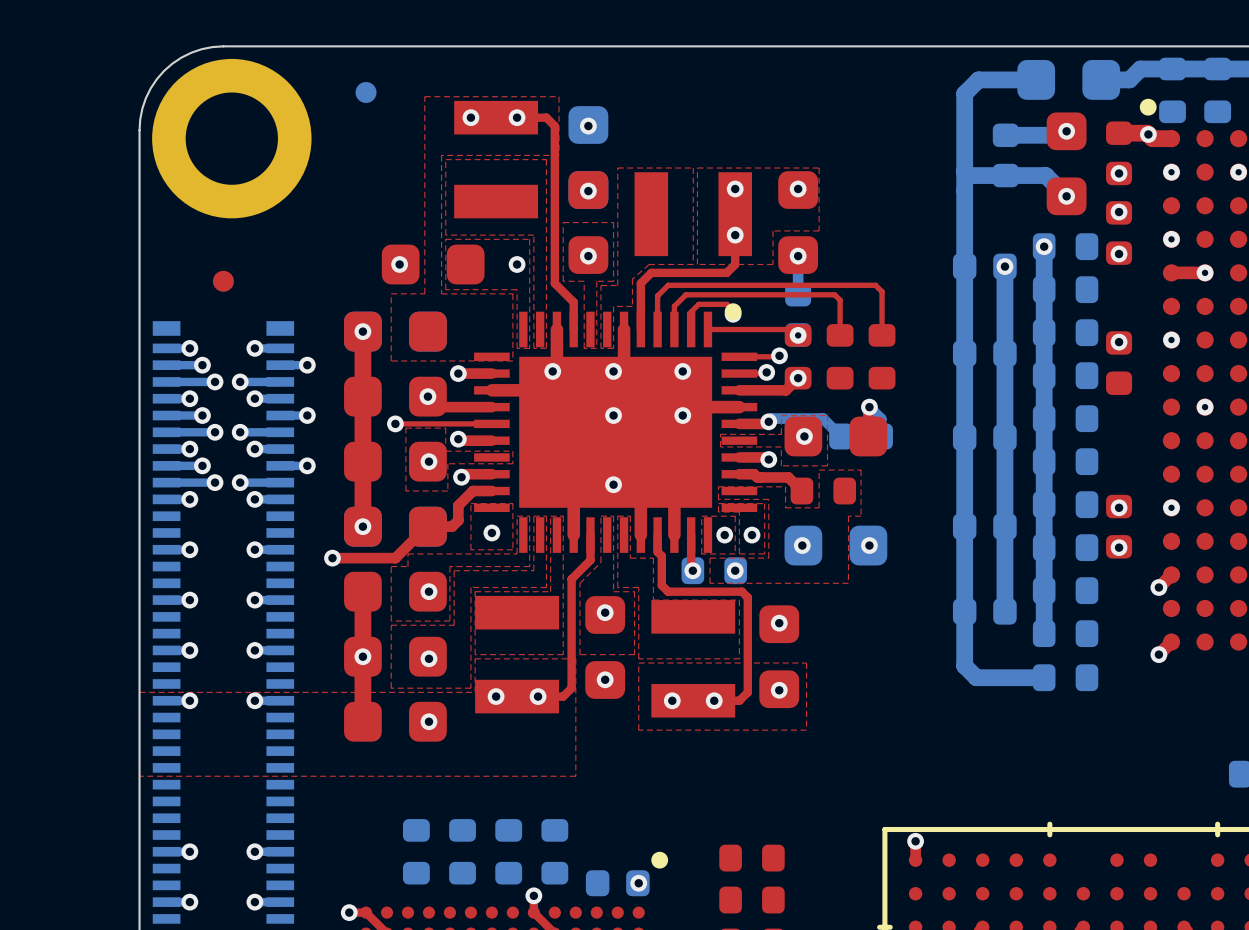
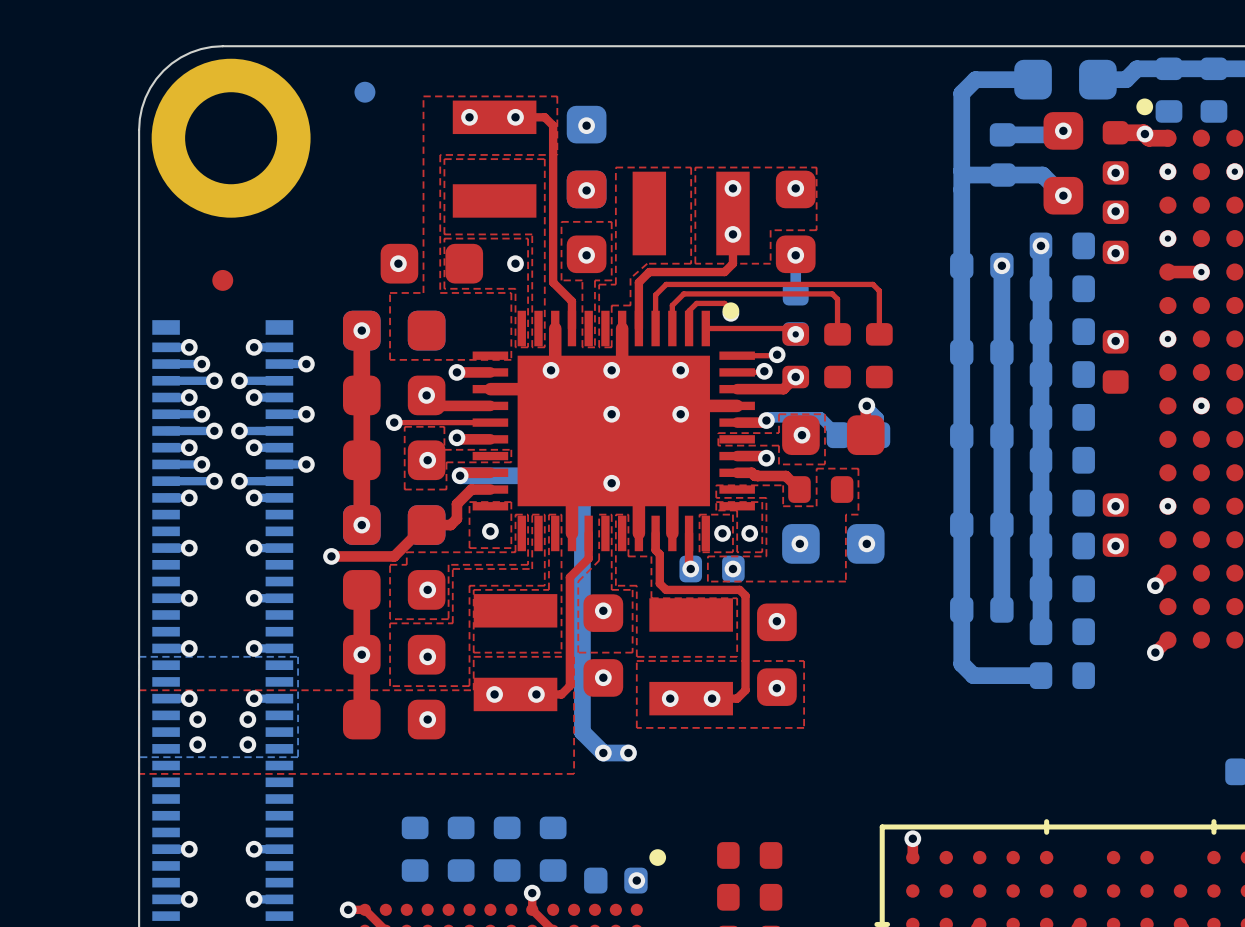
bottom track: none -> (460, 475) (540, 475) (545, 481) (559, 481) (582, 503) (582, 732) (603, 753) (628, 753)
bottom zone outline: none -> (139, 656) (139, 757) (298, 757) (298, 656) (139, 656)
via: none -> (197, 719)
via: none -> (247, 719)
via: none -> (197, 744)
via: none -> (247, 744)
via: none -> (603, 753)
via: none -> (628, 753)

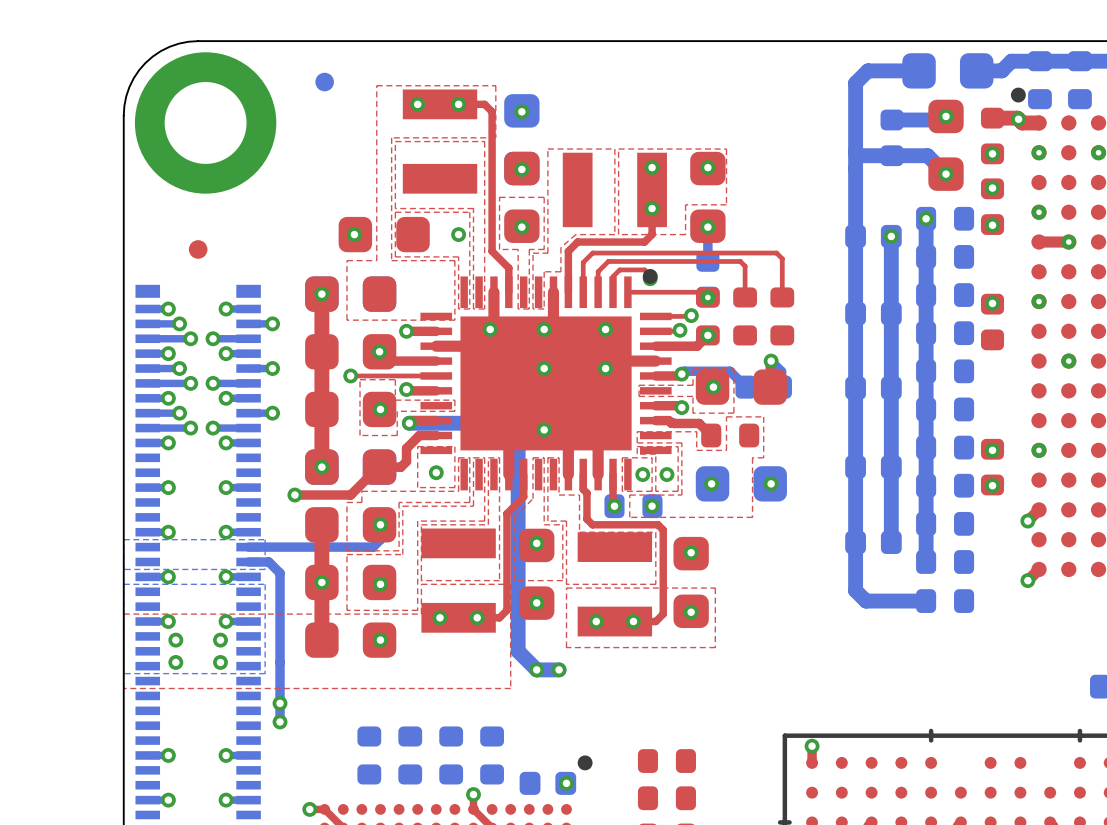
bottom track: none -> (380, 524) (380, 539) (373, 547) (248, 547)
bottom zone outline: none -> (123, 539) (123, 569) (265, 569) (265, 539) (123, 539)
bottom track: none -> (248, 561) (268, 561) (280, 573) (280, 721)
via: none -> (280, 703)
via: none -> (280, 721)

